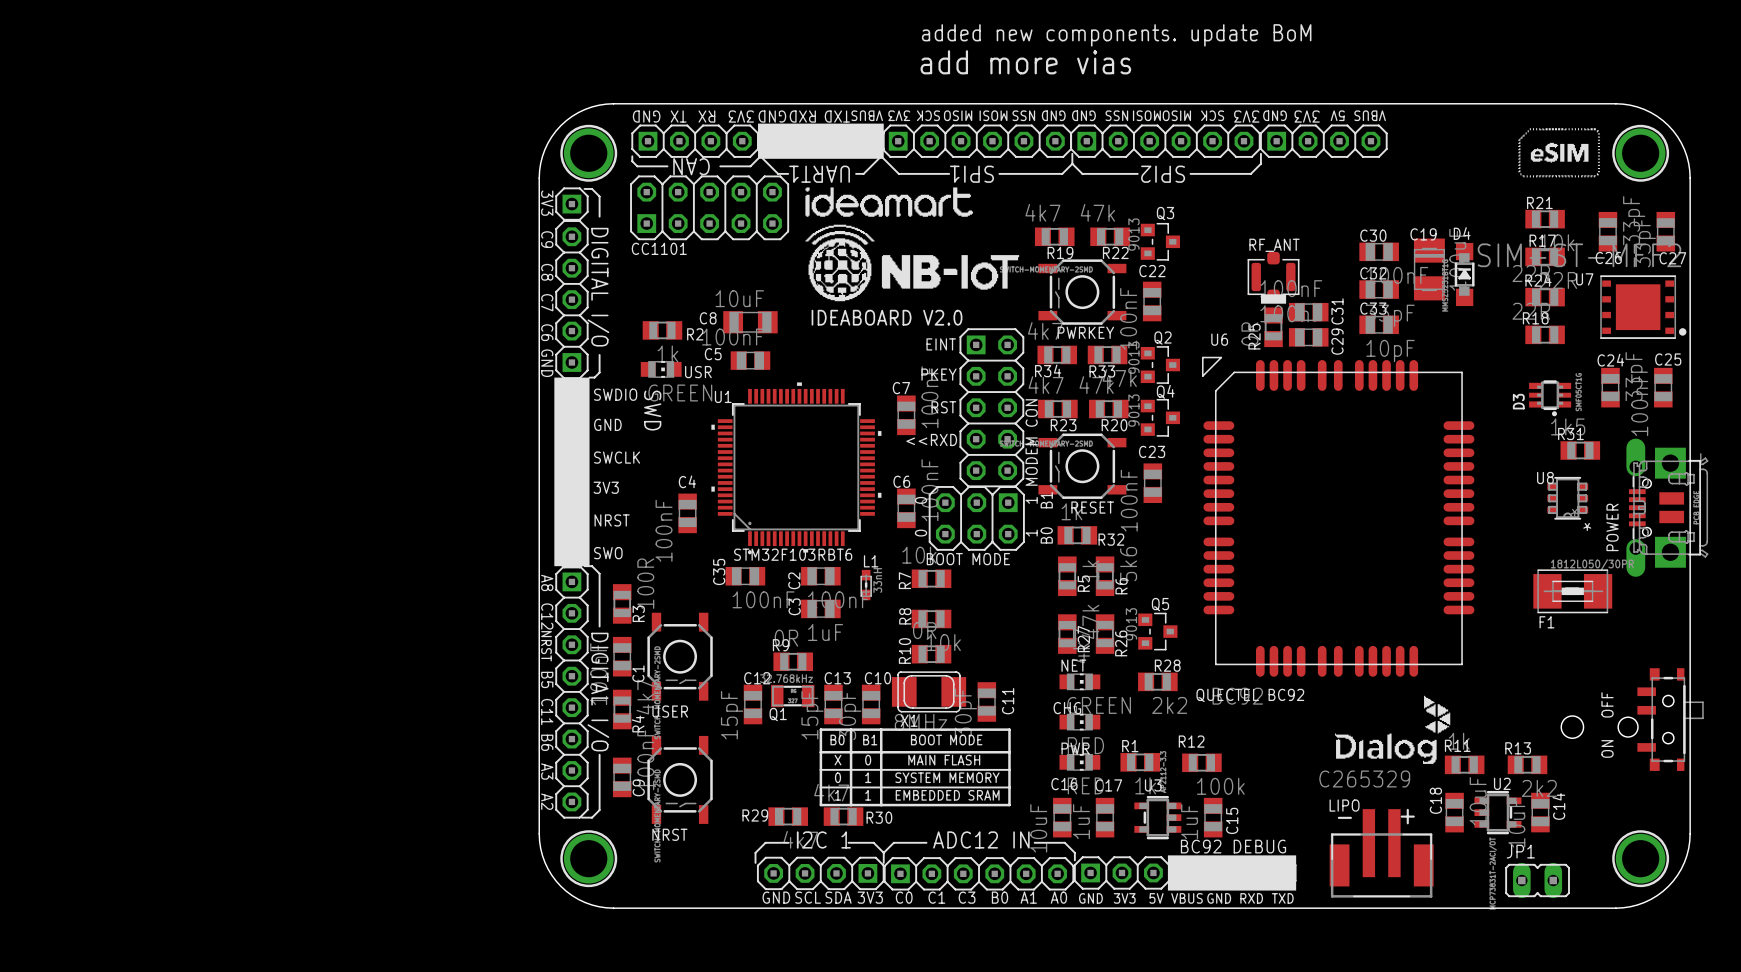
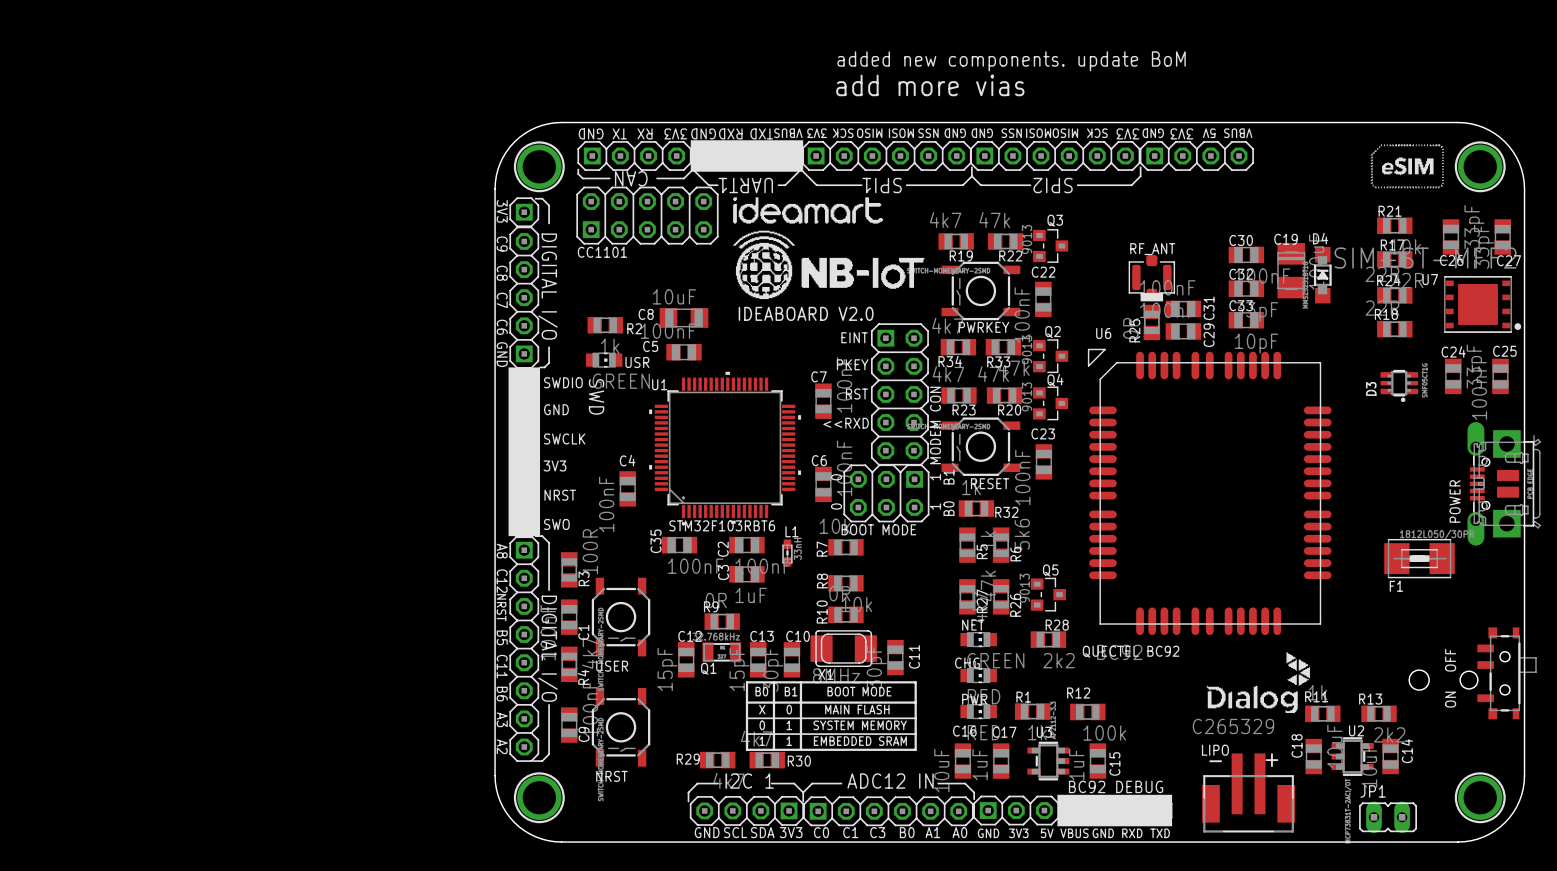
R31: 1k5 (1580, 450) -> none
U8: (1567, 498) -> none

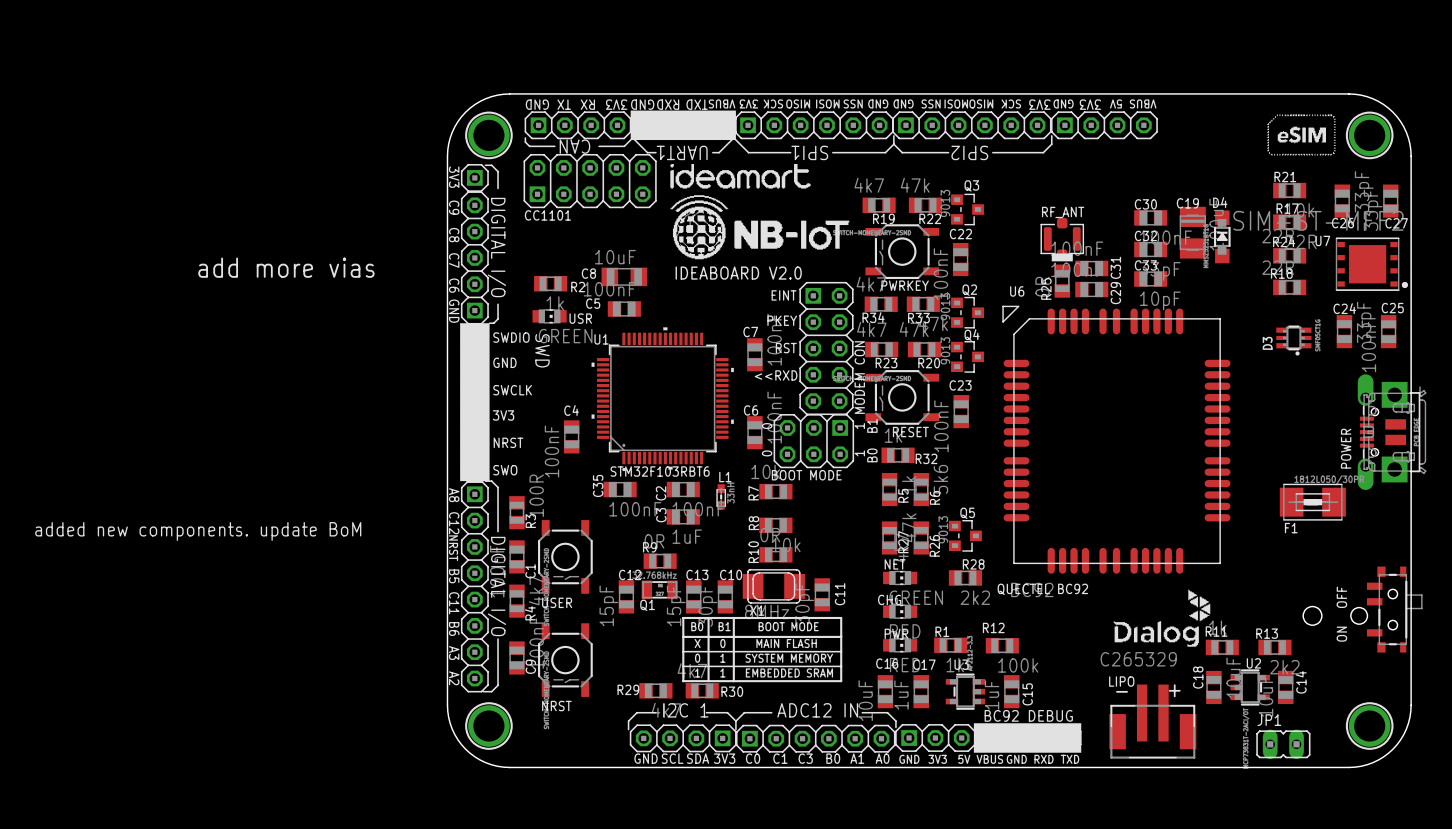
text: added new components. update BoM (1011, 61) -> none
text: add more vias (930, 85) -> none
text: none -> add more vias (286, 267)
text: none -> added new components. update BoM (198, 531)

